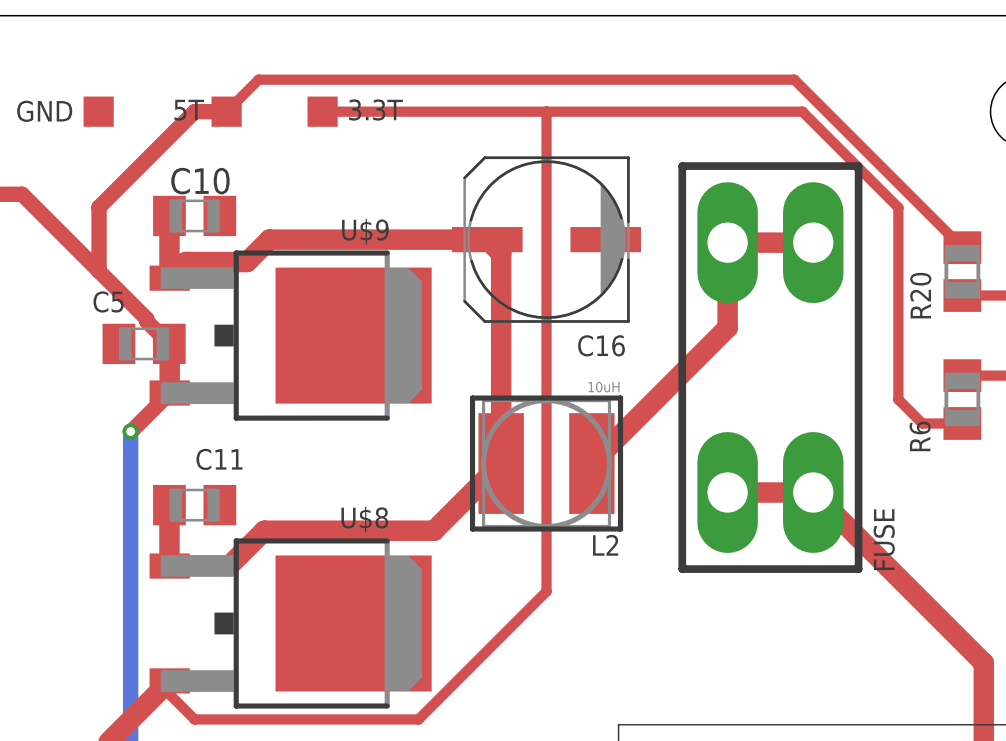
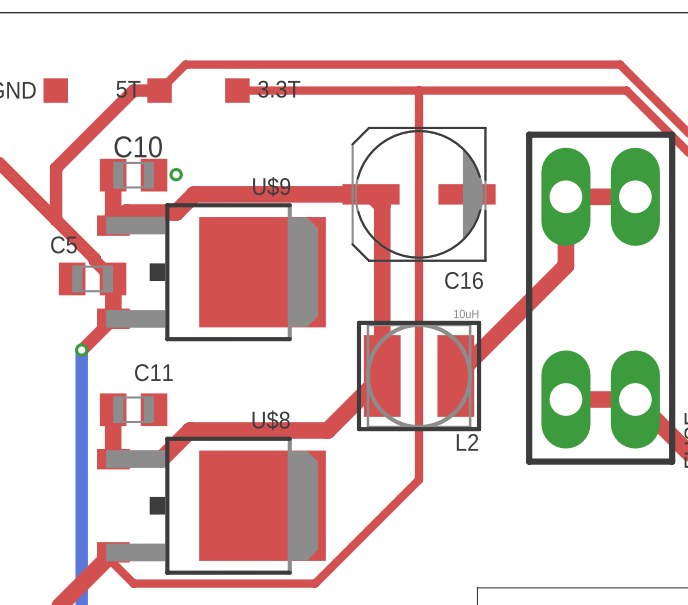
via: none -> (176, 174)

